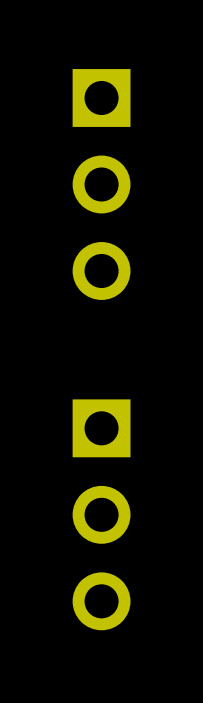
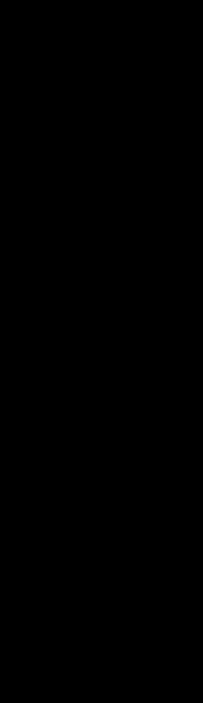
part: (101, 184) -> none
part: (101, 514) -> none

